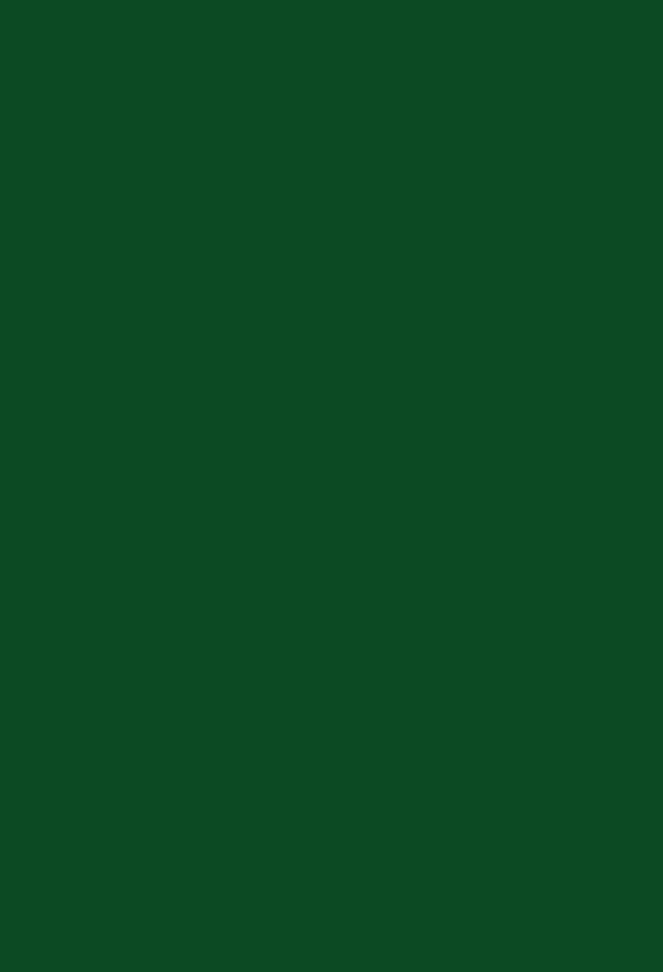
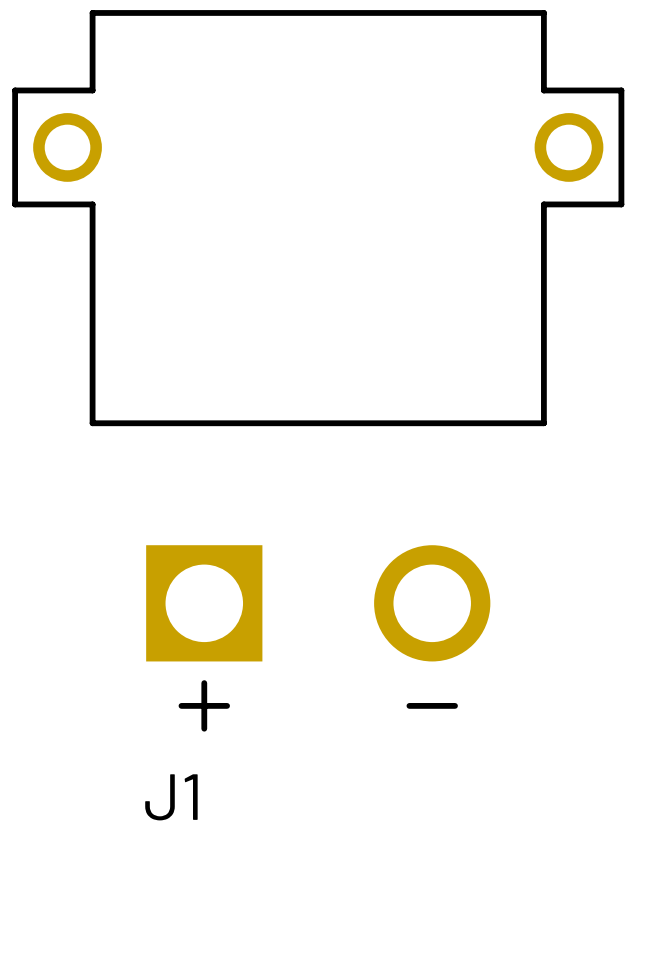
J1: none -> (318, 370)

